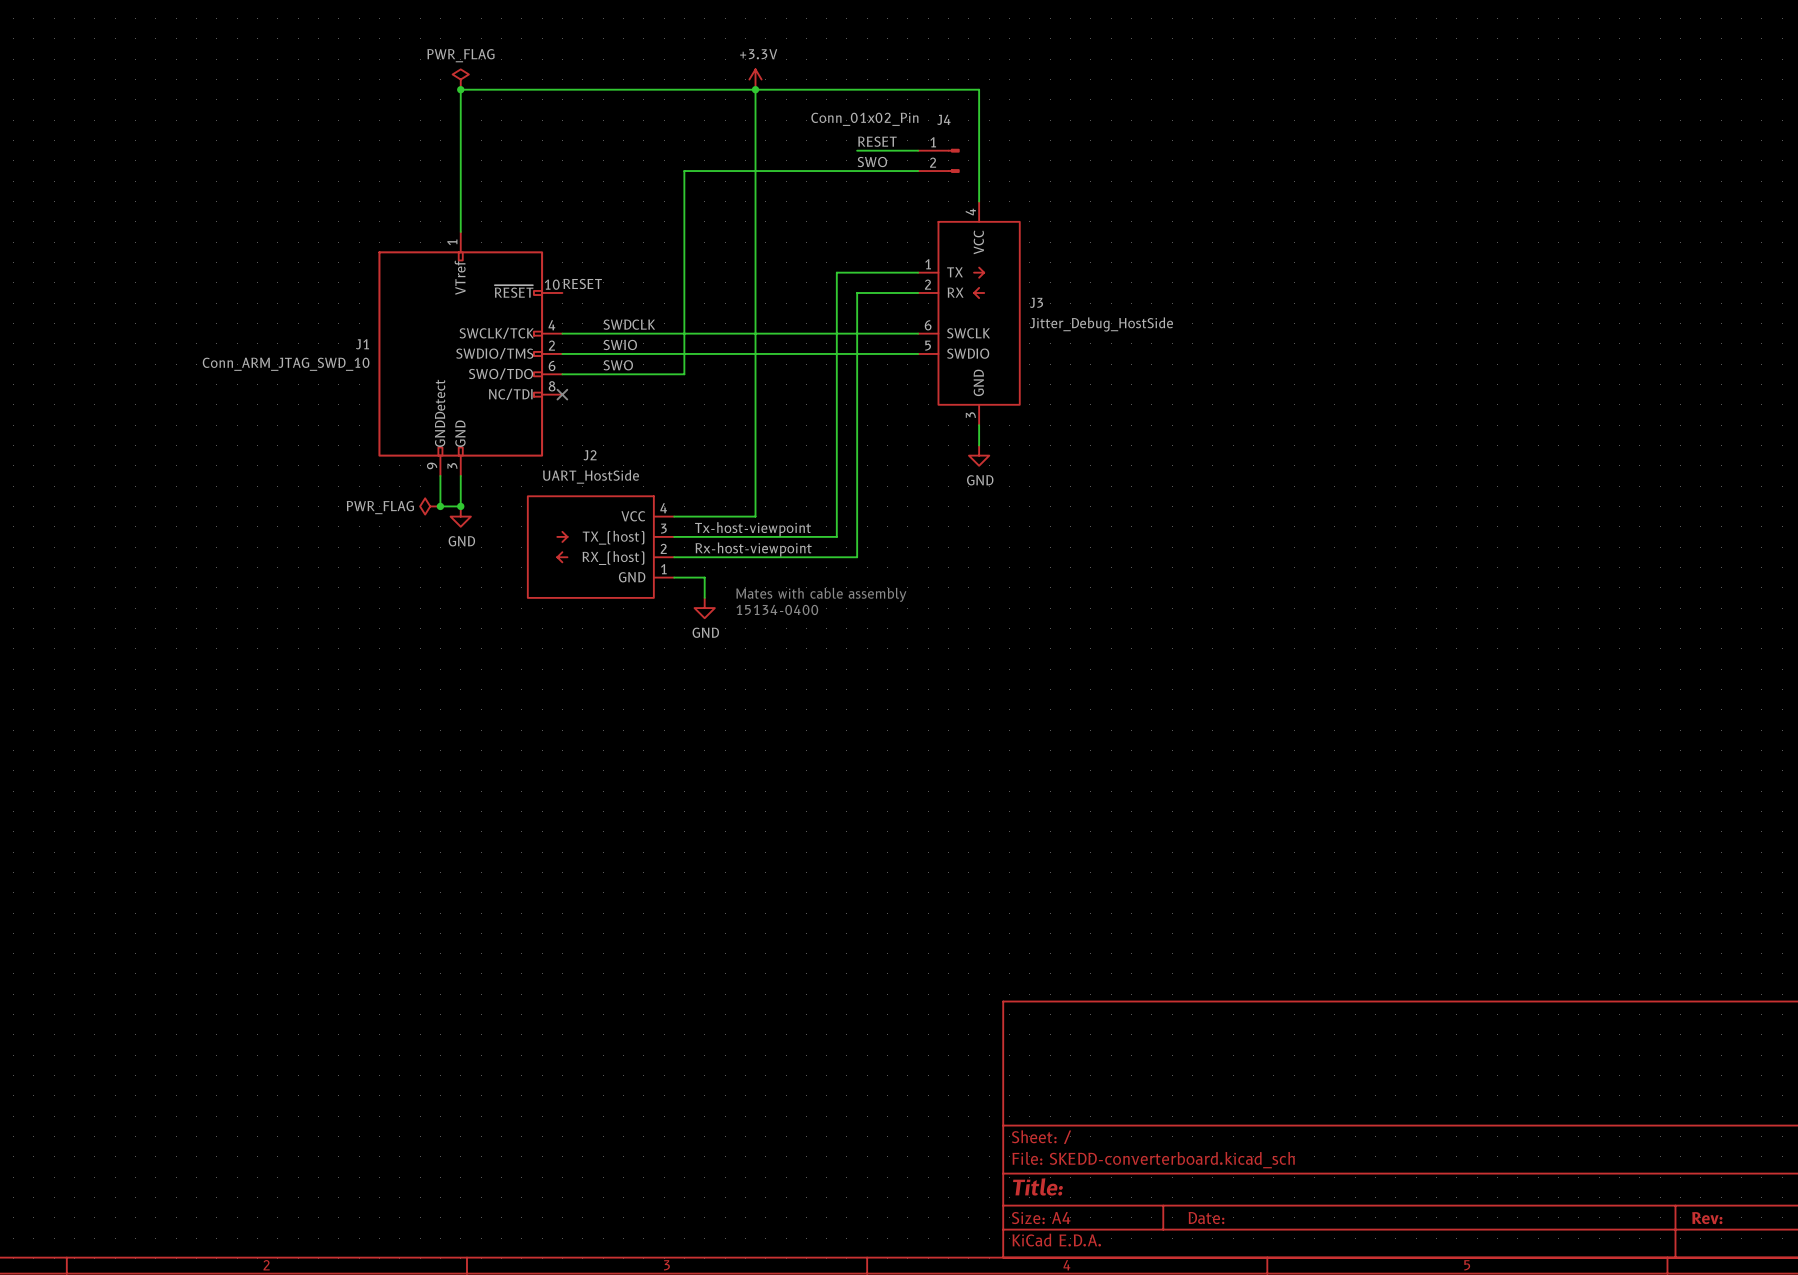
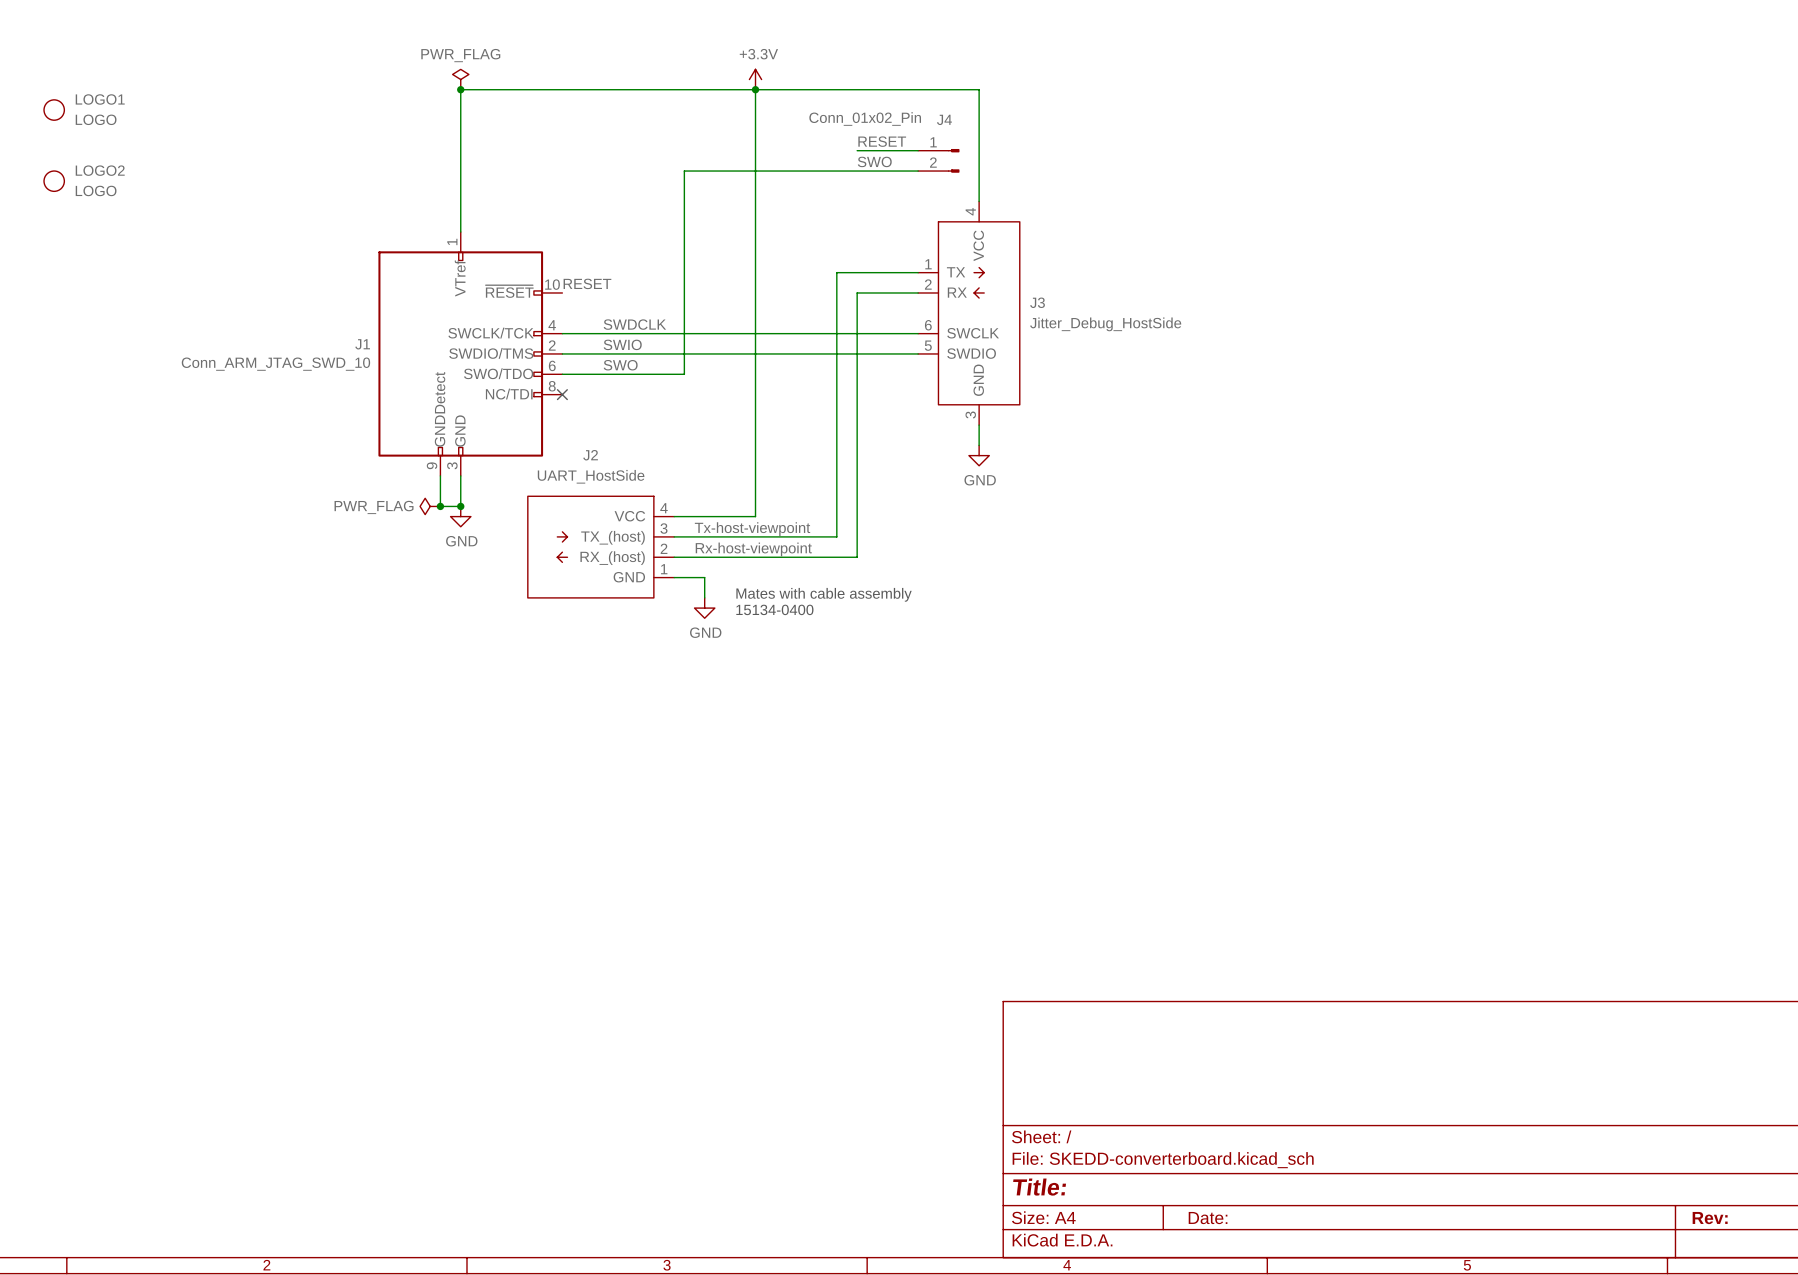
LOGO1: none -> LOGO (54, 110)
LOGO2: none -> LOGO (54, 181)

